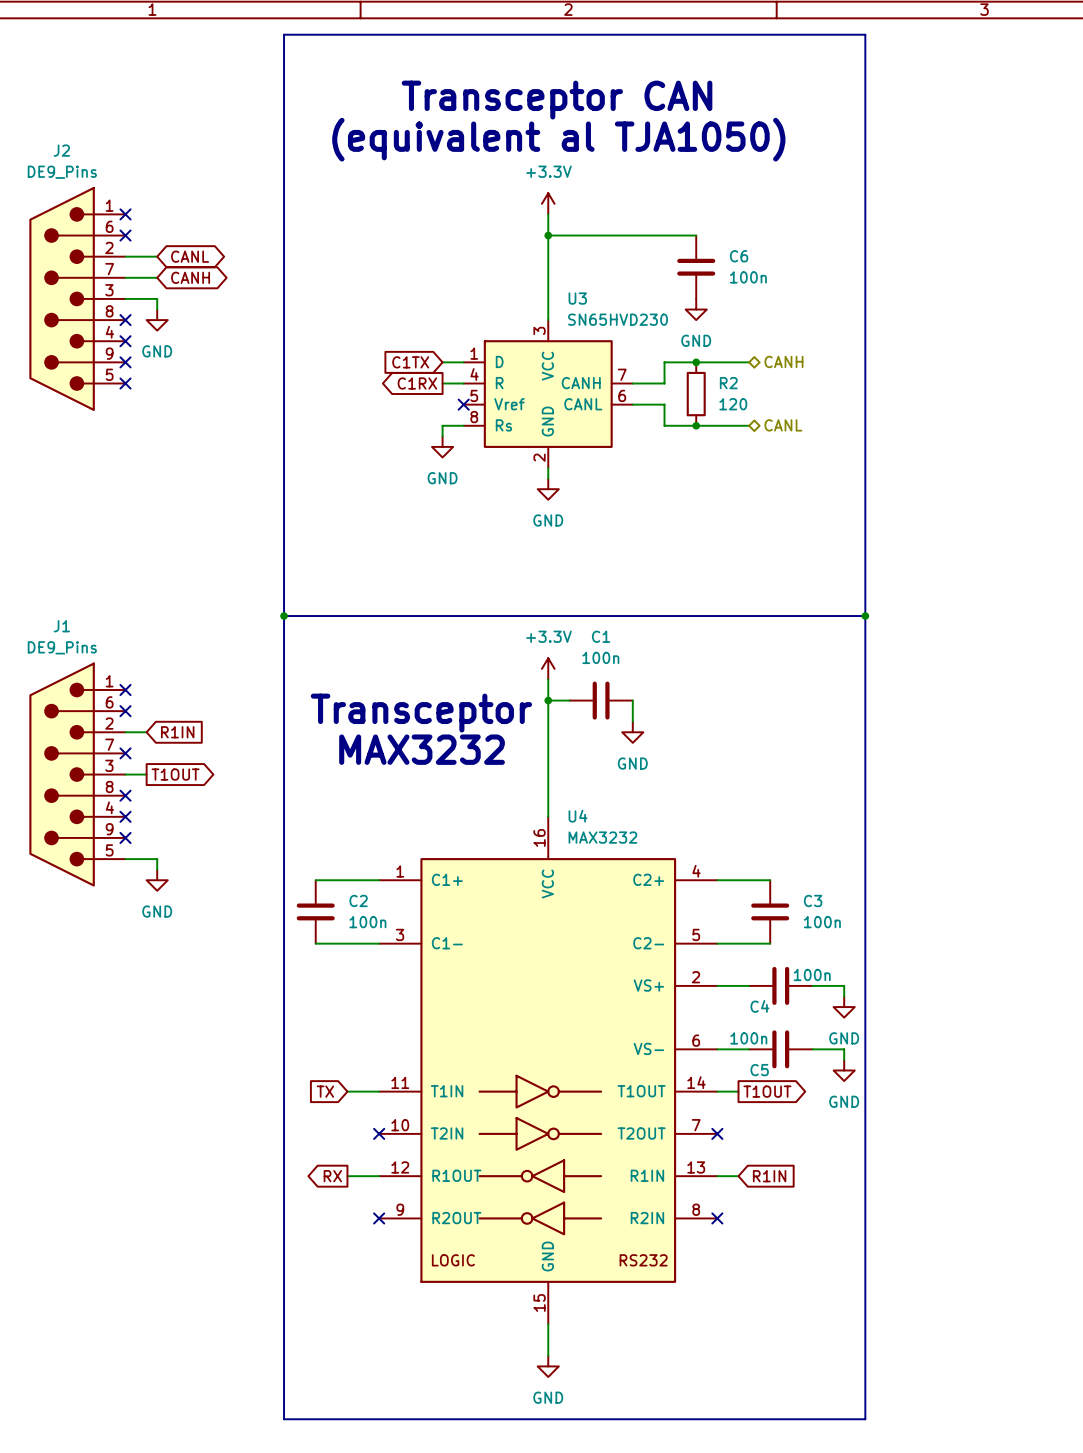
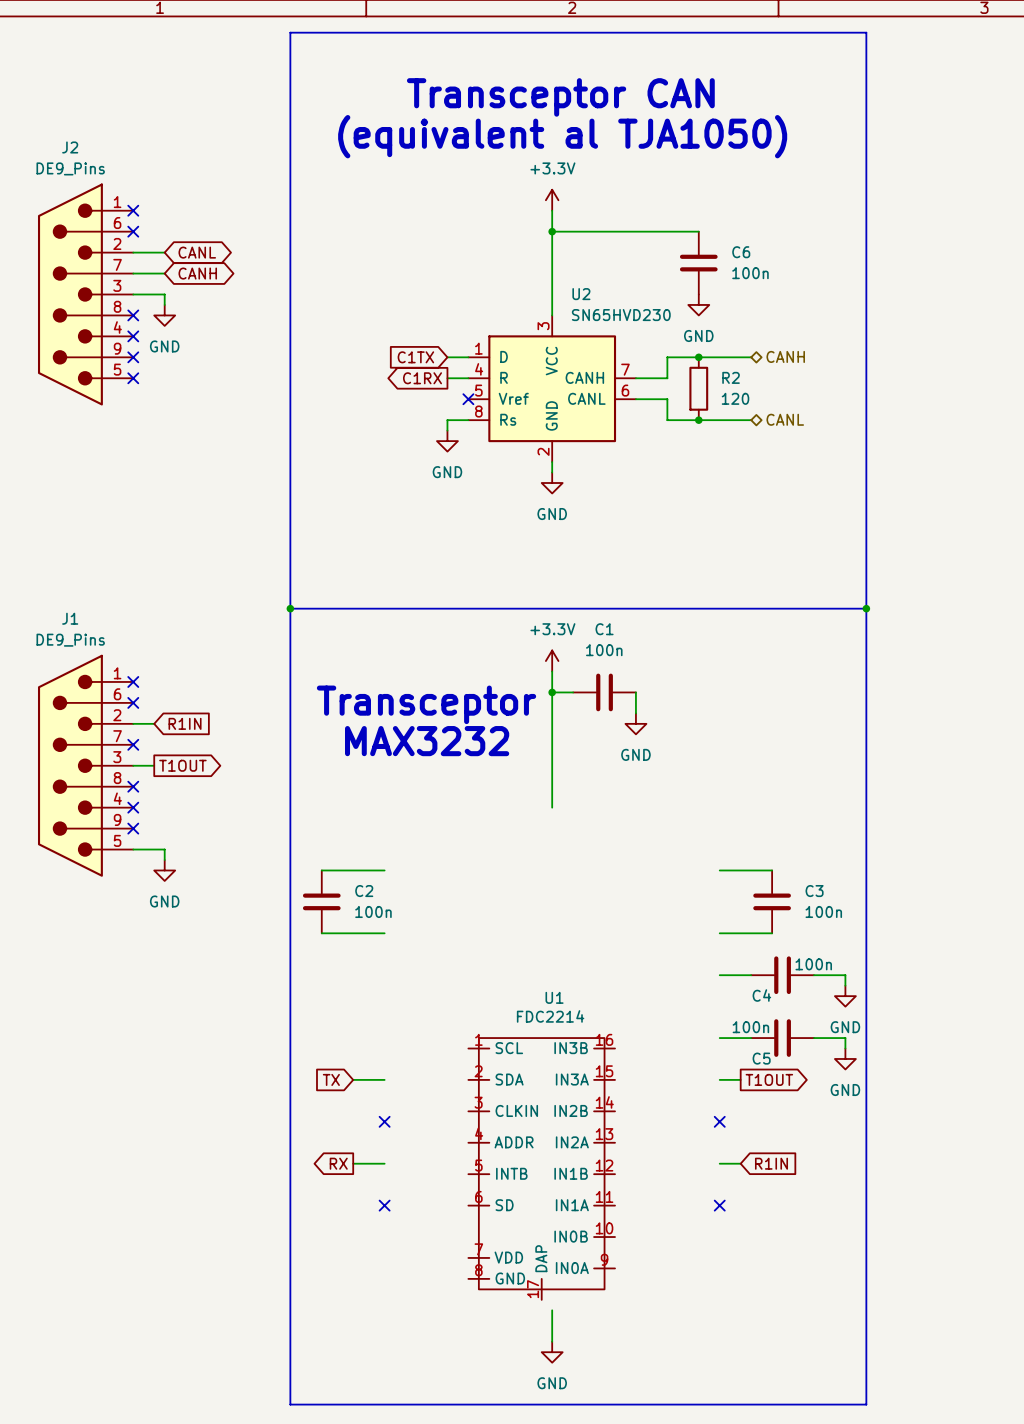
U3 name: U3 (577, 298) -> U2 (581, 294)
U4: MAX3232 (548, 1070) -> none
U1: none -> FDC2214 (541, 1168)

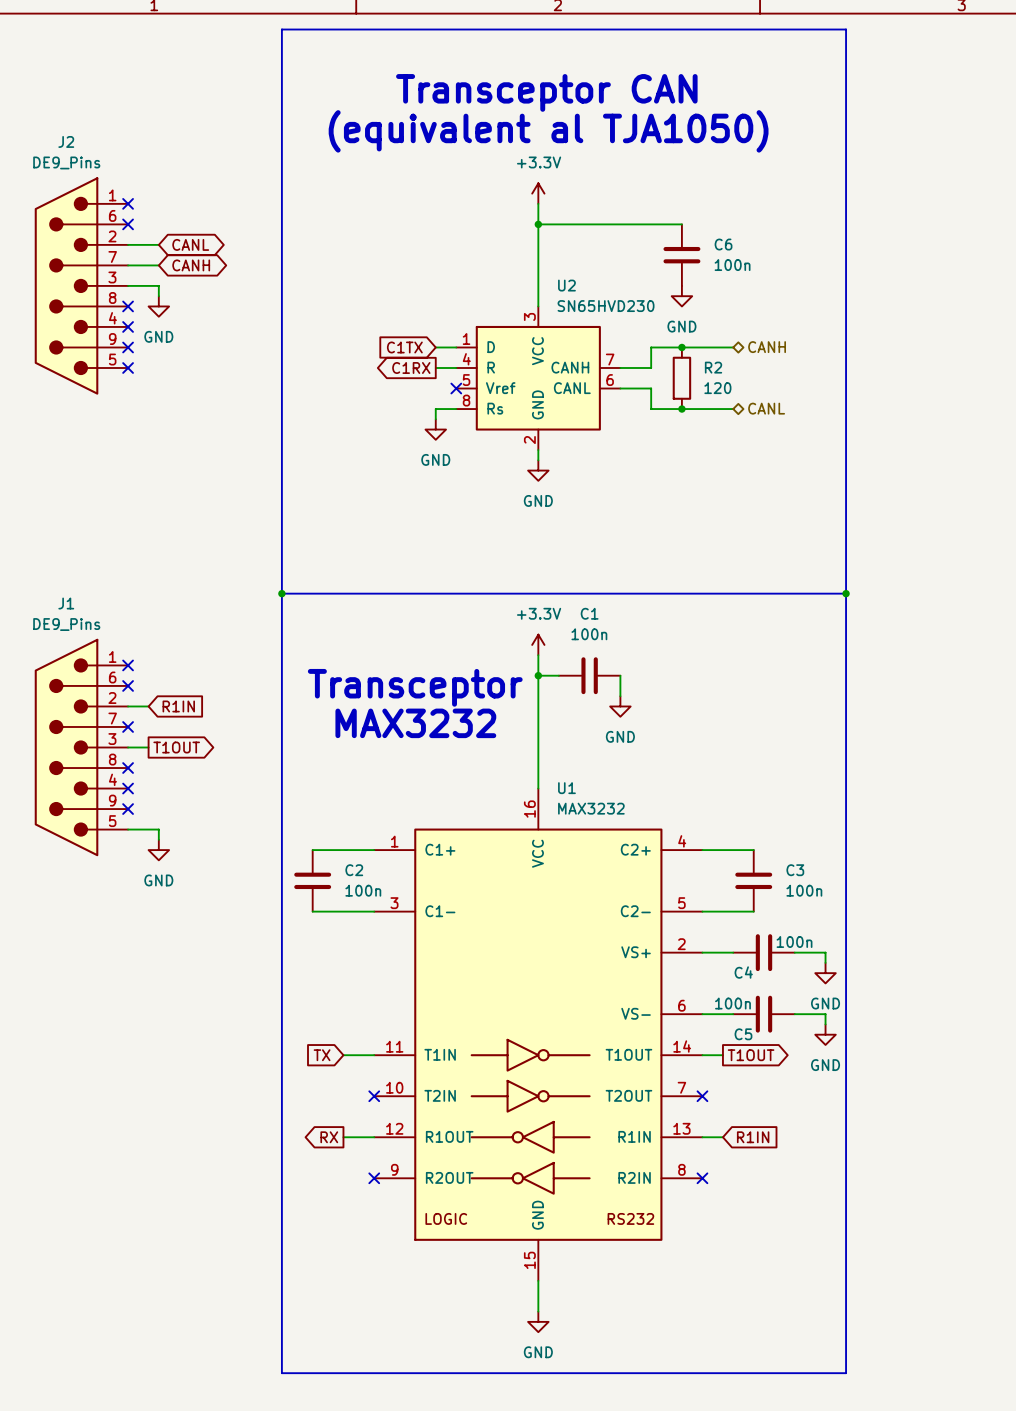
U1 name position: U1 (554, 997) -> U1 (566, 788)
U1 value: FDC2214 (550, 1016) -> MAX3232 (591, 808)
U1 symbol: [468, 1038, 616, 1300] -> [374, 788, 703, 1281]

